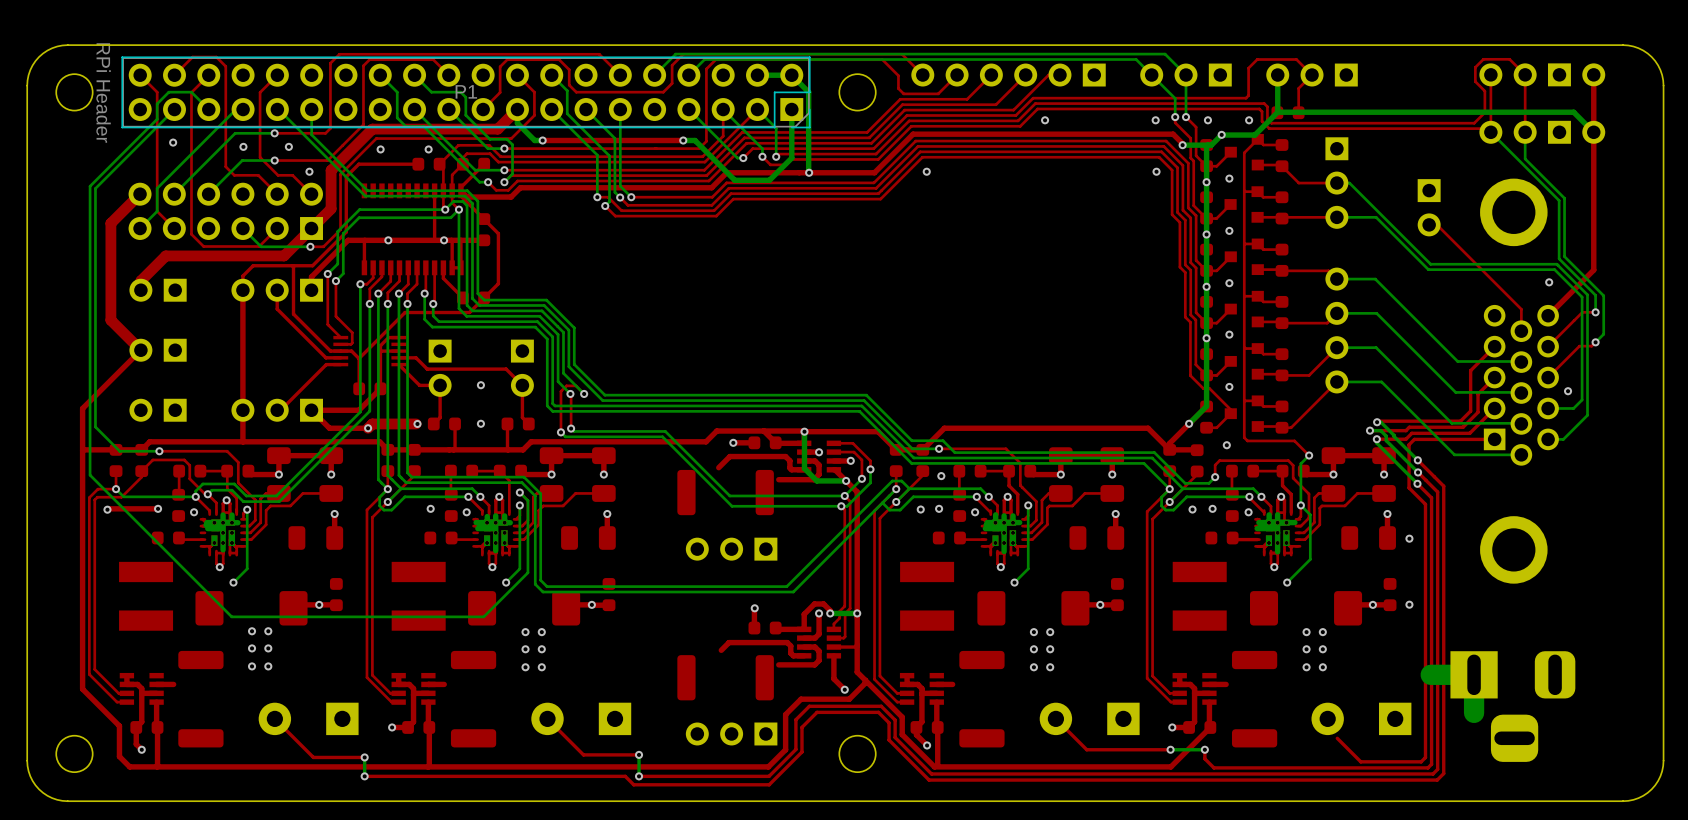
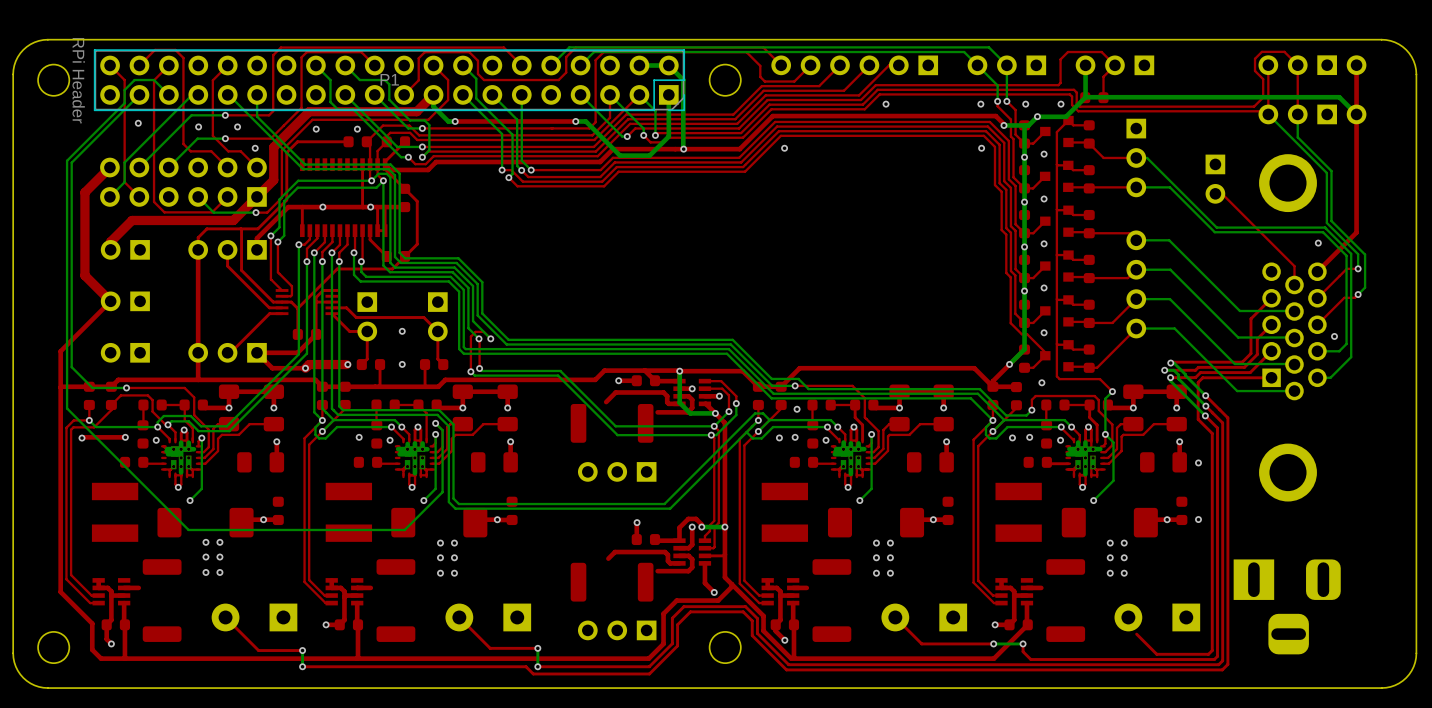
bottom track: (1430, 674) (1474, 674) (1474, 712) -> none

